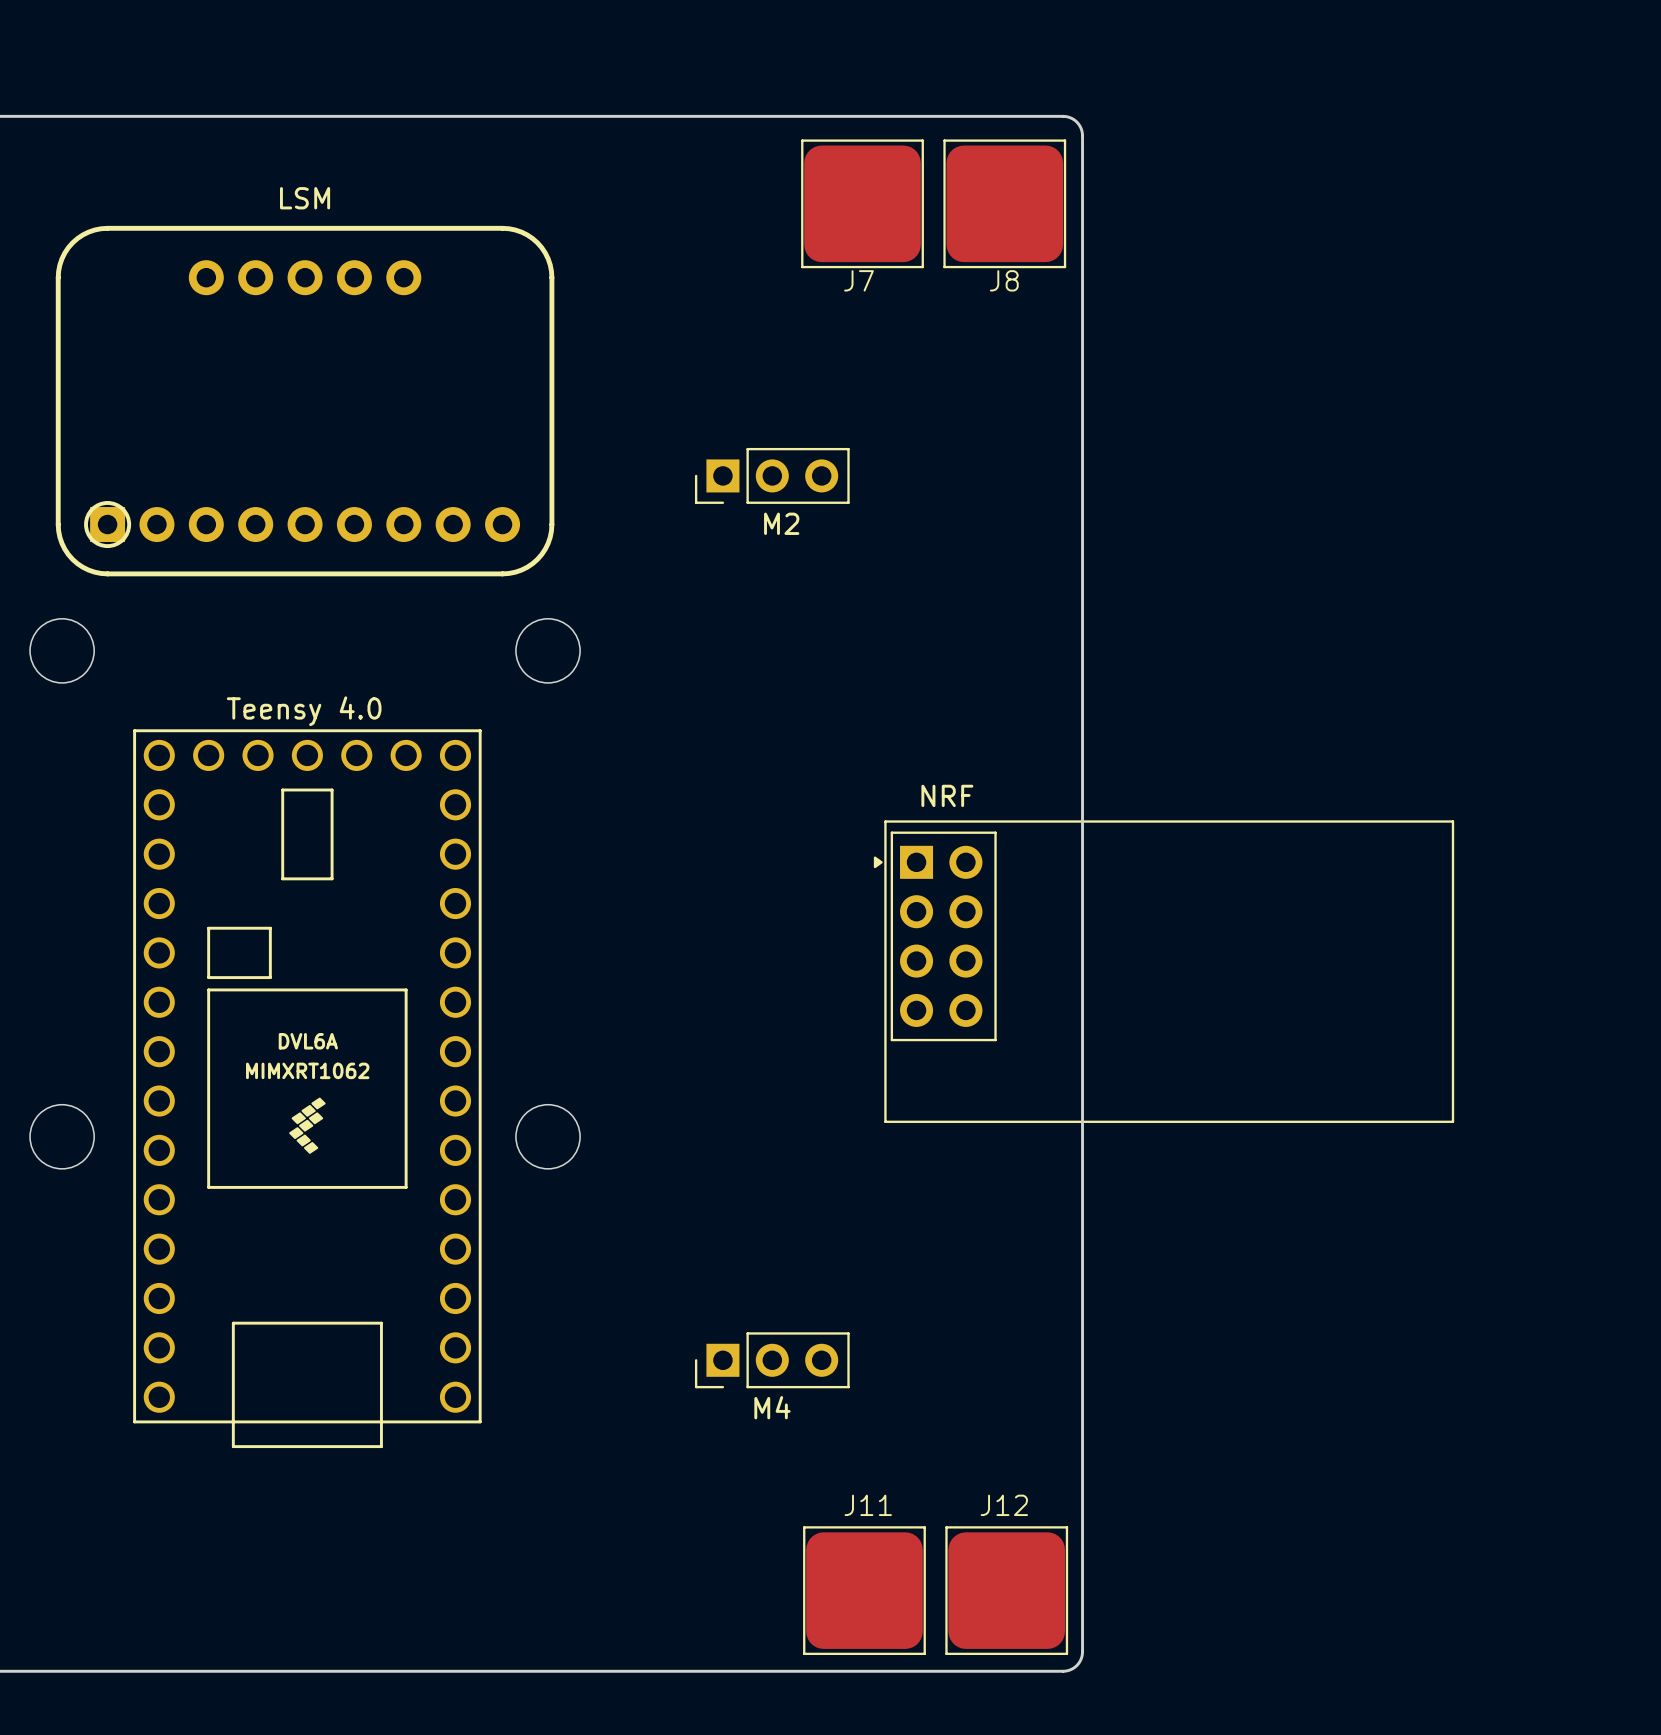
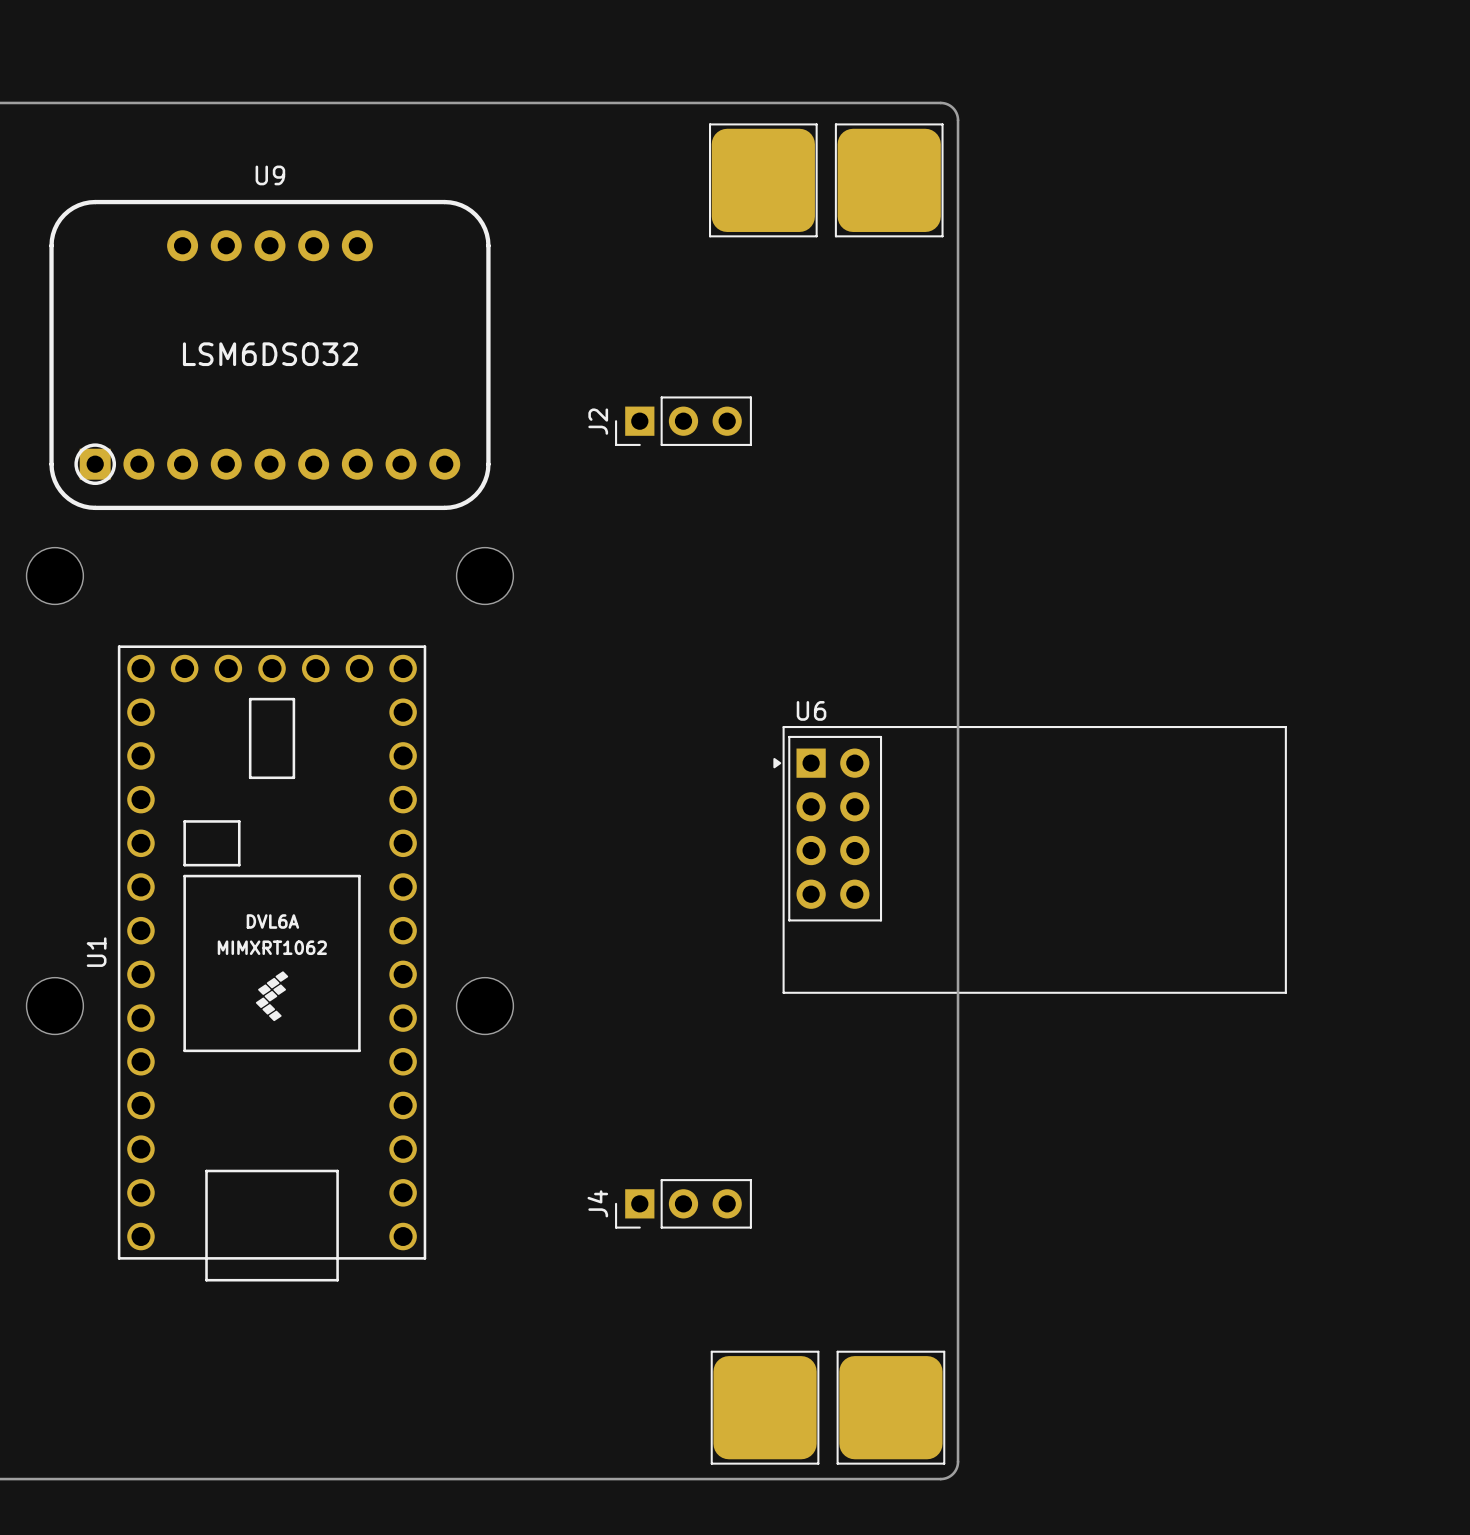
LSM name: LSM (305, 198) -> U9 (270, 175)
text: J7 (859, 280) -> none
text: J8 (1004, 280) -> none
LSM text: none -> LSM6DSO32 (270, 354)
M2 name: M2 (781, 523) -> J2 (598, 421)
Teensy 4.0 name: Teensy 4.0 (304, 711) -> U1 (96, 952)
NRF name: NRF (947, 795) -> U6 (811, 710)
M4 name: M4 (772, 1407) -> J4 (597, 1203)
text: J11 (868, 1505) -> none
text: J12 (1004, 1505) -> none

